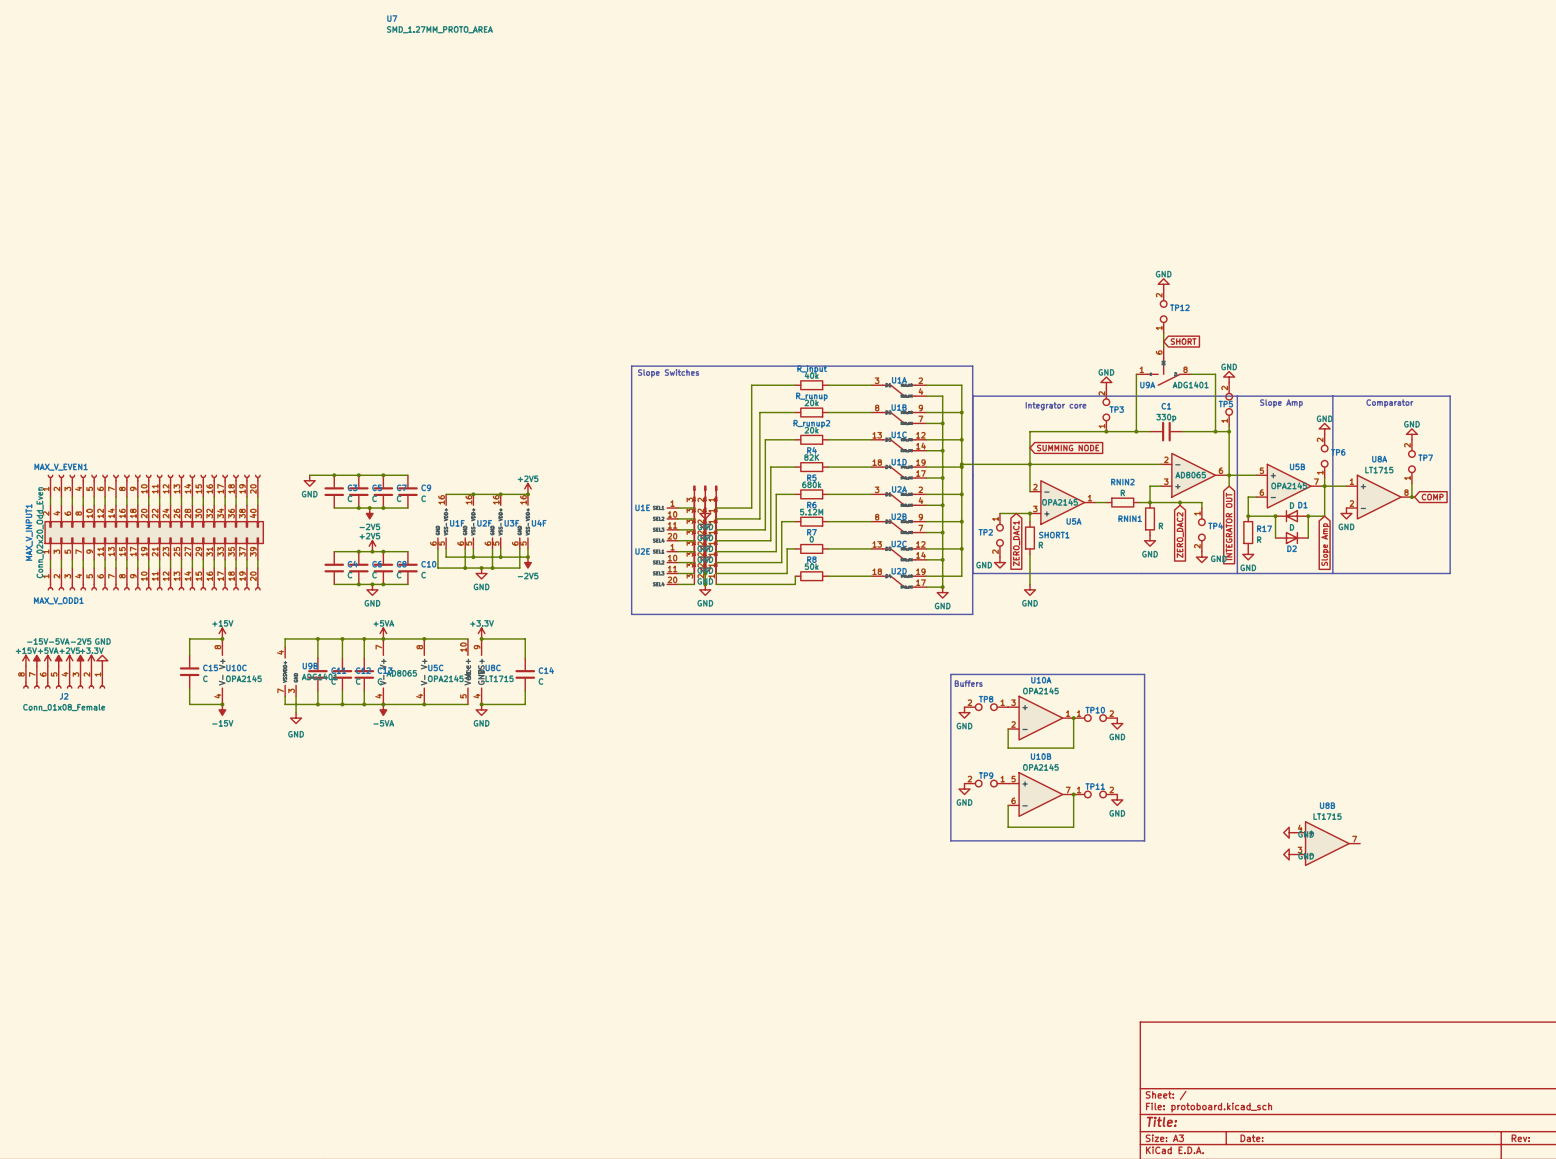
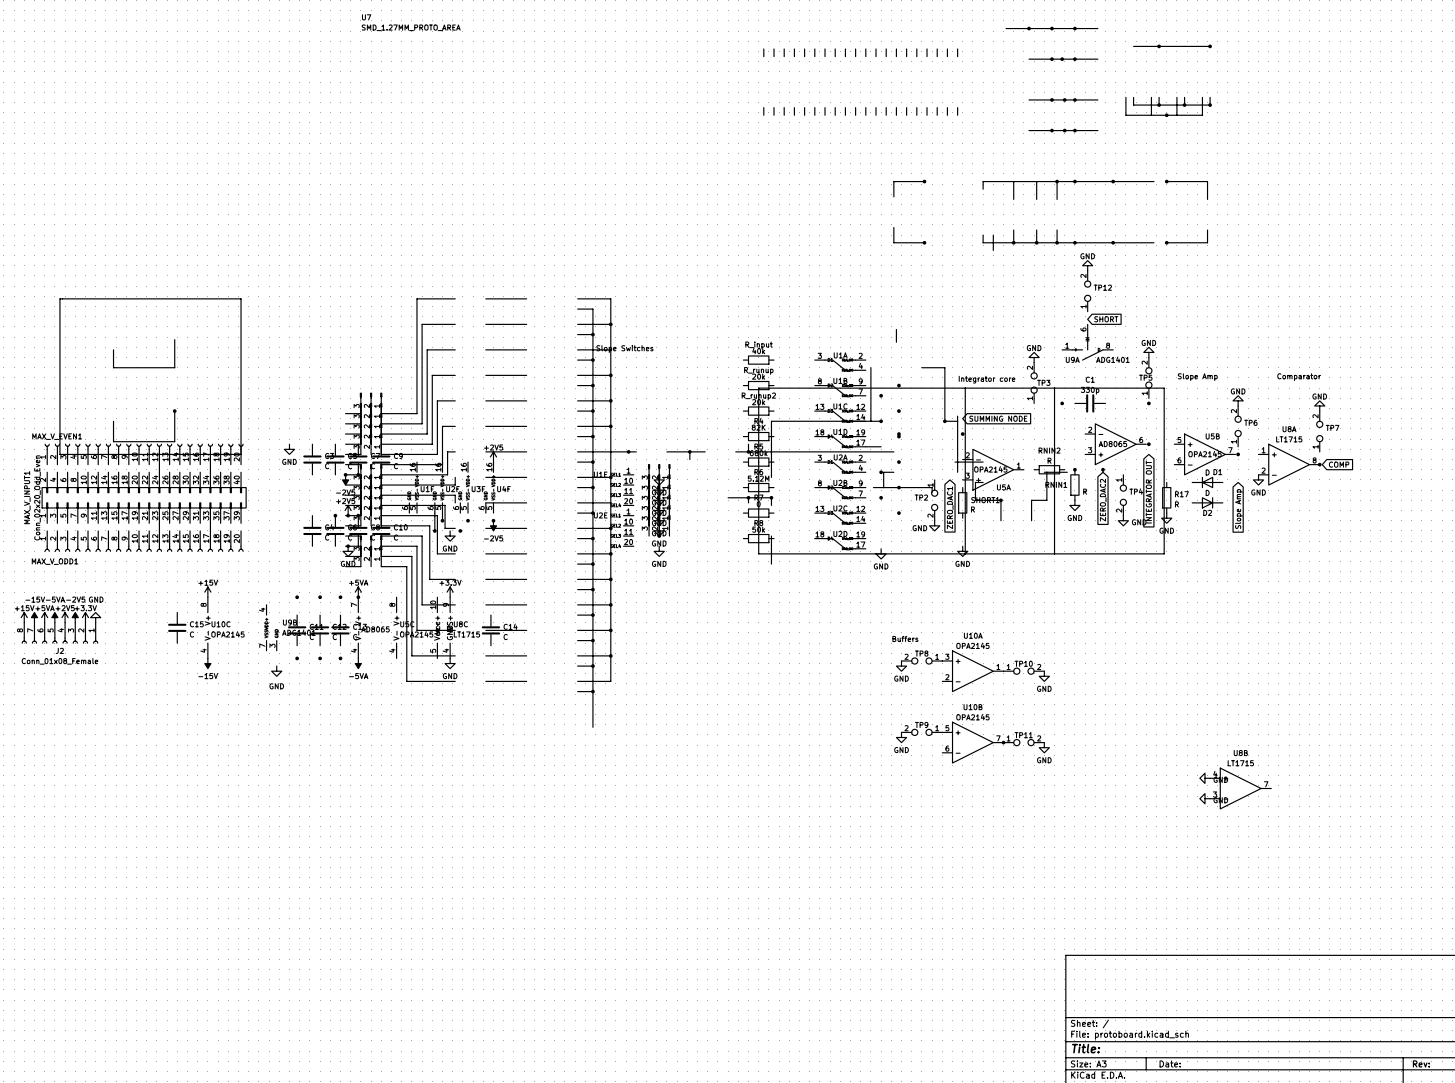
wire: none -> (1006, 28) (1097, 28)
junction: none -> (1029, 28)
junction: none -> (1051, 28)
junction: none -> (1074, 28)
wire: none -> (1133, 46) (1210, 46)
junction: none -> (1159, 46)
junction: none -> (1210, 46)
wire: none -> (763, 48) (763, 56)
wire: none -> (774, 48) (774, 56)
wire: none -> (784, 48) (784, 56)
wire: none -> (794, 48) (794, 56)
wire: none -> (804, 48) (804, 56)
wire: none -> (814, 48) (814, 56)
wire: none -> (825, 48) (825, 56)
wire: none -> (835, 48) (835, 56)
wire: none -> (845, 48) (845, 56)
wire: none -> (855, 48) (855, 56)
wire: none -> (865, 48) (865, 56)
wire: none -> (876, 48) (876, 56)
wire: none -> (886, 48) (886, 56)
wire: none -> (896, 48) (896, 56)
wire: none -> (906, 48) (906, 56)
wire: none -> (916, 48) (916, 56)
wire: none -> (927, 48) (927, 56)
wire: none -> (937, 48) (937, 56)
wire: none -> (947, 48) (947, 56)
wire: none -> (957, 48) (957, 56)
wire: none -> (1029, 59) (1097, 59)
junction: none -> (1051, 59)
junction: none -> (1062, 59)
junction: none -> (1074, 59)
wire: none -> (1125, 97) (1125, 115) (1202, 115) (1202, 97)
wire: none -> (1133, 97) (1133, 105) (1210, 105) (1210, 97)
wire: none -> (1151, 97) (1151, 115)
wire: none -> (1159, 97) (1159, 105)
wire: none -> (1176, 97) (1176, 115)
wire: none -> (1184, 97) (1184, 105)
wire: none -> (1029, 99) (1097, 99)
junction: none -> (1051, 99)
junction: none -> (1064, 99)
junction: none -> (1074, 99)
junction: none -> (1159, 105)
junction: none -> (1184, 105)
junction: none -> (1210, 105)
wire: none -> (763, 107) (763, 115)
wire: none -> (774, 107) (774, 115)
wire: none -> (784, 107) (784, 115)
wire: none -> (794, 107) (794, 115)
wire: none -> (804, 107) (804, 115)
wire: none -> (814, 107) (814, 115)
wire: none -> (825, 107) (825, 115)
wire: none -> (835, 107) (835, 115)
wire: none -> (845, 107) (845, 115)
wire: none -> (855, 107) (855, 115)
wire: none -> (865, 107) (865, 115)
wire: none -> (876, 107) (876, 115)
wire: none -> (886, 107) (886, 115)
wire: none -> (896, 107) (896, 115)
wire: none -> (906, 107) (906, 115)
wire: none -> (916, 107) (916, 115)
wire: none -> (927, 107) (927, 115)
wire: none -> (937, 107) (937, 115)
wire: none -> (947, 107) (947, 115)
wire: none -> (957, 107) (957, 115)
junction: none -> (1166, 115)
wire: none -> (1029, 130) (1097, 130)
junction: none -> (1051, 130)
junction: none -> (1064, 130)
junction: none -> (1074, 130)
wire: none -> (924, 181) (893, 181) (893, 196)
junction: none -> (924, 181)
wire: none -> (1013, 181) (1013, 199)
wire: none -> (1036, 181) (1036, 199)
wire: none -> (1057, 181) (1057, 199)
junction: none -> (1057, 181)
junction: none -> (1074, 181)
junction: none -> (1113, 181)
wire: none -> (1153, 181) (983, 181) (983, 189)
wire: none -> (1166, 181) (1207, 181) (1207, 199)
junction: none -> (1166, 181)
wire: none -> (893, 227) (893, 242) (924, 242)
wire: none -> (1013, 230) (1013, 242)
wire: none -> (1036, 230) (1036, 242)
wire: none -> (1207, 230) (1207, 242) (1166, 242)
wire: none -> (983, 235) (983, 242) (1153, 242)
wire: none -> (993, 235) (993, 250)
junction: none -> (924, 242)
junction: none -> (1013, 242)
junction: none -> (1036, 242)
junction: none -> (1057, 242)
junction: none -> (1074, 242)
junction: none -> (1113, 242)
junction: none -> (1166, 242)
line: none -> (59, 298) (59, 454) (241, 454) (241, 298) (59, 298)
wire: none -> (455, 298) (416, 298) (416, 413) (381, 413)
wire: none -> (485, 298) (526, 298)
wire: none -> (577, 298) (610, 298) (610, 681) (577, 681)
wire: none -> (577, 309) (592, 309) (592, 727)
wire: (1163, 333) (1163, 347) -> (1057, 230) (1057, 242)
wire: none -> (455, 324) (422, 324) (422, 423) (381, 423)
wire: none -> (485, 324) (526, 324)
wire: none -> (577, 324) (610, 324)
junction: none -> (610, 324)
wire: none -> (896, 329) (896, 342)
wire: none -> (577, 334) (592, 334)
junction: none -> (592, 334)
wire: none -> (174, 339) (174, 367) (113, 367) (113, 349)
line: (631, 366) (972, 366) (972, 614) (631, 614) (631, 366) -> none
wire: none -> (455, 349) (427, 349) (427, 434) (381, 434)
wire: none -> (485, 349) (526, 349)
wire: none -> (577, 349) (610, 349)
wire: (1136, 374) (1136, 431) -> none
wire: (1190, 374) (1215, 374) (1215, 431) -> none
wire: none -> (577, 360) (592, 360)
junction: none -> (592, 360)
wire: (795, 385) (751, 385) (751, 508) (716, 508) -> none
wire: (828, 385) (871, 385) -> none
wire: (926, 385) (961, 385) (961, 576) (926, 576) -> none
wire: none -> (870, 367) (870, 421)
wire: none -> (921, 367) (944, 367) (944, 421) (957, 421)
wire: (926, 396) (942, 396) (942, 587) (926, 587) -> none
line: (972, 396) (1450, 396) (1450, 573) (972, 573) -> none
line: (1237, 396) (1237, 573) -> none
line: (1332, 396) (1332, 573) -> none
wire: none -> (485, 375) (526, 375)
wire: none -> (577, 375) (610, 375)
junction: none -> (610, 375)
wire: none -> (577, 385) (592, 385)
junction: none -> (592, 385)
wire: (795, 412) (759, 412) (759, 518) (716, 518) -> none
wire: (828, 412) (871, 412) -> none
wire: (926, 412) (961, 412) -> none
line: none -> (758, 388) (758, 553) (1164, 553) (1164, 388) (758, 388)
line: none -> (965, 388) (965, 553)
line: none -> (1054, 388) (1054, 553)
wire: (926, 423) (942, 423) -> none
wire: (1229, 426) (1229, 486) -> none
wire: none -> (455, 400) (437, 400) (437, 454) (381, 454)
wire: none -> (485, 400) (526, 400)
wire: none -> (577, 400) (610, 400)
junction: none -> (610, 400)
part: none -> (371, 403)
junction: (1106, 431) -> none
wire: (1150, 431) (1029, 431) (1029, 491) -> none
wire: (1182, 431) (1229, 431) -> none
junction: (1215, 431) -> none
wire: none -> (174, 411) (174, 441) (113, 441) (113, 421)
junction: none -> (174, 411)
wire: none -> (577, 411) (592, 411)
junction: none -> (592, 411)
wire: (795, 439) (765, 439) (765, 529) (716, 529) -> none
wire: (828, 439) (871, 439) -> none
wire: (926, 439) (961, 439) -> none
wire: none -> (345, 413) (360, 413)
part: none -> (371, 413)
wire: none -> (957, 416) (957, 472)
wire: none -> (865, 421) (771, 421) (771, 477)
junction: none -> (944, 421)
wire: none -> (345, 423) (360, 423)
part: none -> (371, 423)
wire: none -> (455, 426) (442, 426) (442, 464) (381, 464)
wire: none -> (485, 426) (526, 426)
wire: none -> (577, 426) (610, 426)
junction: none -> (610, 426)
wire: none -> (345, 434) (360, 434)
part: none -> (371, 433)
wire: (961, 464) (1160, 464) -> none
junction: none -> (592, 436)
wire: (795, 467) (770, 467) (770, 540) (716, 540) -> none
wire: (828, 467) (871, 467) -> none
wire: (926, 467) (961, 467) -> none
wire: (309, 475) (369, 475) -> none
junction: (334, 475) -> none
junction: (358, 475) -> none
junction: (383, 475) -> none
wire: (386, 475) (407, 475) -> (455, 375) (432, 375) (432, 444) (381, 444)
part: none -> (371, 444)
wire: none -> (748, 444) (748, 451)
wire: (1226, 475) (1256, 475) -> none
junction: (942, 478) -> none
wire: (1324, 478) (1324, 516) (1308, 516) (1308, 538) -> none
wire: none -> (485, 451) (526, 451)
wire: none -> (577, 451) (636, 451)
junction: none -> (628, 451)
wire: none -> (666, 451) (705, 451)
wire: none -> (689, 451) (689, 459)
junction: none -> (689, 451)
wire: none -> (735, 451) (893, 451)
junction: none -> (748, 451)
wire: (1411, 483) (1411, 497) (1414, 497) -> none
wire: none -> (345, 454) (360, 454)
wire: (1160, 486) (1150, 486) (1150, 502) -> none
wire: (1321, 486) (1346, 486) -> none
wire: (446, 494) (527, 494) -> none
junction: (473, 494) -> none
junction: (500, 494) -> none
junction: (527, 494) -> none
junction: none -> (592, 462)
wire: (795, 494) (776, 494) (776, 551) (716, 551) -> none
wire: (828, 494) (871, 494) -> none
wire: (926, 494) (961, 494) -> none
wire: none -> (955, 462) (983, 462)
part: (705, 496) -> none
wire: (50, 497) (50, 505) -> none
wire: (61, 497) (61, 505) -> none
wire: (72, 497) (72, 505) -> none
wire: (83, 497) (83, 505) -> none
wire: (94, 497) (94, 505) -> none
wire: (105, 497) (105, 505) -> none
wire: (115, 497) (115, 505) -> none
wire: (126, 497) (126, 505) -> none
wire: (137, 497) (137, 505) -> none
wire: (148, 497) (148, 505) -> none
wire: (159, 497) (159, 505) -> none
wire: (181, 497) (181, 505) -> none
wire: (192, 497) (192, 505) -> none
wire: (203, 497) (203, 505) -> none
wire: (214, 497) (214, 505) -> none
wire: (236, 497) (236, 505) -> none
wire: (246, 497) (246, 505) -> none
wire: (257, 497) (257, 505) -> none
wire: none -> (345, 464) (360, 464)
wire: (1256, 497) (1248, 497) (1248, 516) (1275, 516) (1275, 538) -> none
wire: (1095, 502) (1106, 502) -> none
wire: (1139, 502) (1201, 502) (1201, 508) -> none
wire: (926, 505) (942, 505) -> none
wire: none -> (893, 472) (883, 472) (883, 487)
wire: none -> (1044, 472) (1067, 472)
wire: none -> (1046, 472) (1046, 500) (1031, 500) (1031, 520)
part: none -> (371, 474)
wire: (334, 508) (369, 508) -> none
junction: (358, 508) -> none
wire: (386, 508) (407, 508) -> (455, 451) (447, 451) (447, 474) (381, 474)
wire: (678, 508) (694, 508) -> (577, 462) (592, 462)
wire: none -> (455, 477) (455, 485) (381, 485)
wire: none -> (485, 477) (526, 477)
wire: none -> (577, 477) (610, 477)
junction: none -> (610, 477)
wire: (999, 513) (1029, 513) (1029, 521) -> none
junction: (1029, 513) -> none
wire: none -> (983, 482) (975, 482) (975, 500) (1000, 500) (1000, 520)
junction: (1248, 516) -> none
junction: (1275, 516) -> none
junction: (1308, 516) -> none
wire: none -> (345, 485) (360, 485)
part: none -> (371, 484)
wire: (678, 518) (694, 518) -> (577, 487) (592, 487)
junction: none -> (592, 487)
wire: (795, 521) (781, 521) (781, 562) (716, 562) -> none
wire: (828, 521) (871, 521) -> none
wire: none -> (832, 487) (842, 487)
wire: (926, 521) (934, 521) -> none
wire: none -> (898, 487) (932, 487) (932, 492)
wire: none -> (345, 495) (360, 495)
part: none -> (371, 495)
wire: none -> (381, 495) (455, 495) (455, 502)
wire: (678, 529) (694, 529) -> (577, 436) (592, 436)
wire: none -> (728, 497) (771, 497) (771, 505)
wire: none -> (748, 497) (748, 502)
junction: none -> (748, 497)
junction: none -> (771, 497)
wire: (926, 532) (942, 532) -> none
junction: none -> (1000, 500)
wire: none -> (485, 502) (526, 502)
wire: none -> (577, 502) (610, 502)
wire: none -> (345, 505) (360, 505)
part: none -> (371, 505)
wire: none -> (381, 505) (445, 505) (445, 528) (455, 528)
wire: (678, 540) (694, 540) -> none
wire: (437, 548) (437, 568) (519, 568) (519, 548) -> none
wire: (446, 548) (446, 557) (527, 557) (527, 548) -> none
wire: (492, 548) (492, 568) -> none
wire: (500, 548) (500, 557) -> none
junction: none -> (592, 513)
wire: (795, 548) (787, 548) (787, 573) (716, 573) -> none
wire: (828, 548) (871, 548) -> none
wire: (926, 548) (961, 548) -> none
wire: (334, 551) (369, 551) -> none
wire: (386, 551) (407, 551) -> (455, 553) (437, 553) (437, 515) (381, 515)
part: none -> (371, 515)
wire: (678, 551) (694, 551) -> (577, 589) (592, 589)
wire: (1029, 554) (1029, 584) -> none
wire: (50, 559) (50, 568) -> none
wire: (61, 559) (61, 568) -> none
wire: (72, 559) (72, 568) -> none
wire: (83, 559) (83, 568) -> none
wire: (94, 559) (94, 568) -> none
wire: (105, 559) (105, 568) -> none
wire: (115, 559) (115, 568) -> none
wire: (126, 559) (126, 568) -> none
wire: (137, 559) (137, 568) -> none
wire: (148, 559) (148, 568) -> none
wire: (159, 559) (159, 568) -> none
wire: (181, 559) (181, 568) -> none
wire: (192, 559) (192, 568) -> none
wire: (203, 559) (203, 568) -> none
wire: (214, 559) (214, 568) -> none
wire: (236, 559) (236, 568) -> none
wire: (246, 559) (246, 568) -> none
wire: (257, 559) (257, 568) -> none
wire: (926, 559) (942, 559) -> none
junction: (942, 559) -> none
wire: none -> (345, 525) (360, 525)
wire: none -> (381, 525) (429, 525) (429, 579) (455, 579)
wire: (678, 562) (694, 562) -> (577, 513) (592, 513)
wire: none -> (485, 528) (526, 528)
wire: none -> (577, 528) (610, 528)
junction: none -> (610, 528)
junction: (481, 568) -> none
wire: none -> (345, 536) (360, 536)
wire: none -> (381, 536) (422, 536) (422, 604) (455, 604)
wire: (678, 573) (694, 573) -> (577, 538) (592, 538)
part: (705, 573) -> none
wire: none -> (771, 536) (771, 564)
junction: none -> (592, 538)
wire: (795, 576) (795, 584) (716, 584) -> none
wire: (828, 576) (871, 576) -> none
wire: (334, 584) (369, 584) -> none
junction: (358, 584) -> none
junction: (383, 584) -> none
wire: (386, 584) (407, 584) -> (455, 630) (416, 630) (416, 546) (381, 546)
part: none -> (371, 546)
wire: (678, 584) (694, 584) -> (577, 564) (592, 564)
junction: (705, 584) -> none
junction: (942, 587) -> none
wire: none -> (485, 553) (526, 553)
wire: none -> (577, 553) (610, 553)
junction: none -> (610, 553)
wire: none -> (345, 556) (360, 556)
part: none -> (371, 556)
wire: none -> (381, 556) (411, 556) (411, 655) (455, 655)
junction: none -> (592, 564)
wire: none -> (345, 566) (360, 566)
wire: none -> (381, 566) (406, 566) (406, 681) (455, 681)
wire: none -> (485, 579) (526, 579)
wire: none -> (577, 579) (610, 579)
junction: none -> (610, 579)
junction: none -> (592, 589)
wire: (222, 638) (189, 638) (189, 655) -> none
junction: (222, 638) -> none
wire: (317, 638) (317, 658) -> none
wire: (342, 638) (342, 658) -> none
wire: (364, 638) (364, 658) -> none
junction: (424, 638) -> none
wire: (467, 638) (285, 638) (285, 647) -> none
wire: (481, 638) (525, 638) (525, 658) -> none
junction: (481, 638) -> none
wire: none -> (485, 604) (526, 604)
wire: none -> (577, 604) (610, 604)
junction: none -> (610, 604)
wire: none -> (577, 615) (592, 615)
junction: none -> (592, 615)
wire: none -> (485, 630) (526, 630)
wire: none -> (577, 630) (610, 630)
junction: none -> (610, 630)
line: (950, 674) (950, 840) (1144, 840) (1144, 674) (950, 674) -> none
wire: none -> (577, 640) (592, 640)
junction: none -> (592, 640)
wire: (189, 688) (189, 704) (222, 704) -> none
wire: (317, 690) (317, 704) -> none
wire: (342, 690) (342, 704) -> none
wire: (364, 690) (364, 704) -> none
wire: (525, 690) (525, 704) (481, 704) -> none
wire: (285, 696) (285, 704) (467, 704) -> none
wire: (296, 696) (296, 712) -> none
wire: none -> (485, 655) (526, 655)
wire: none -> (577, 655) (610, 655)
junction: none -> (610, 655)
junction: (222, 704) -> none
junction: (383, 704) -> none
junction: (424, 704) -> none
junction: (481, 704) -> none
wire: none -> (577, 666) (592, 666)
junction: none -> (592, 666)
wire: (1073, 718) (1073, 748) (1008, 748) (1008, 729) -> none
junction: (1073, 718) -> none
wire: none -> (485, 681) (526, 681)
wire: none -> (577, 691) (592, 691)
junction: none -> (592, 691)
wire: (1073, 794) (1073, 827) (1008, 827) (1008, 805) -> none

